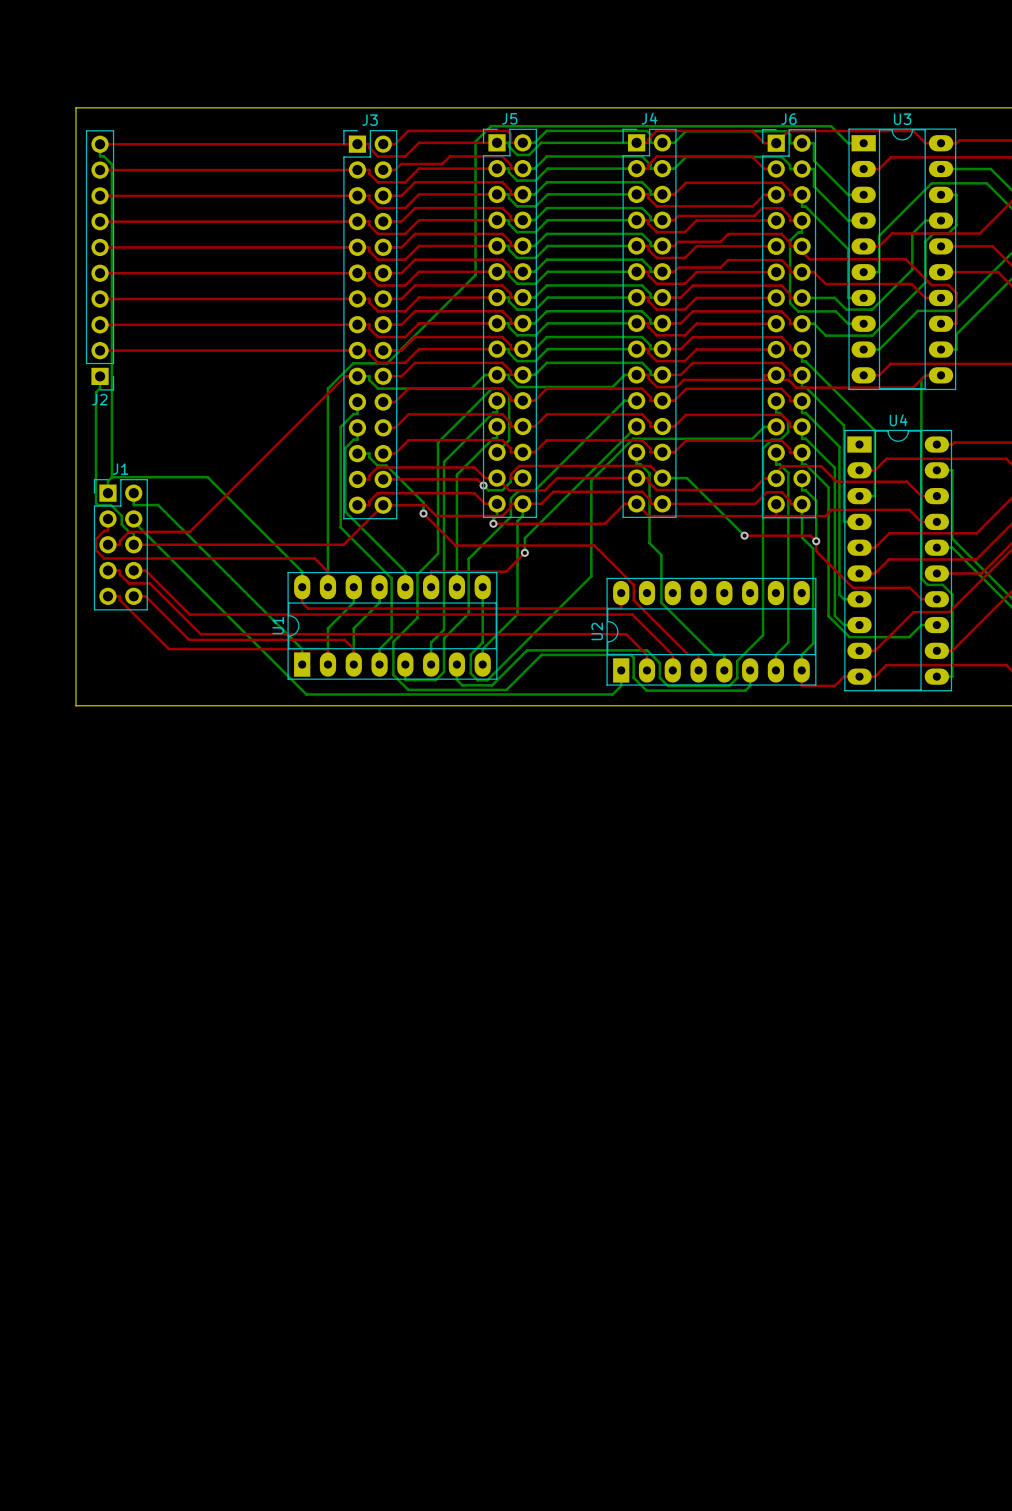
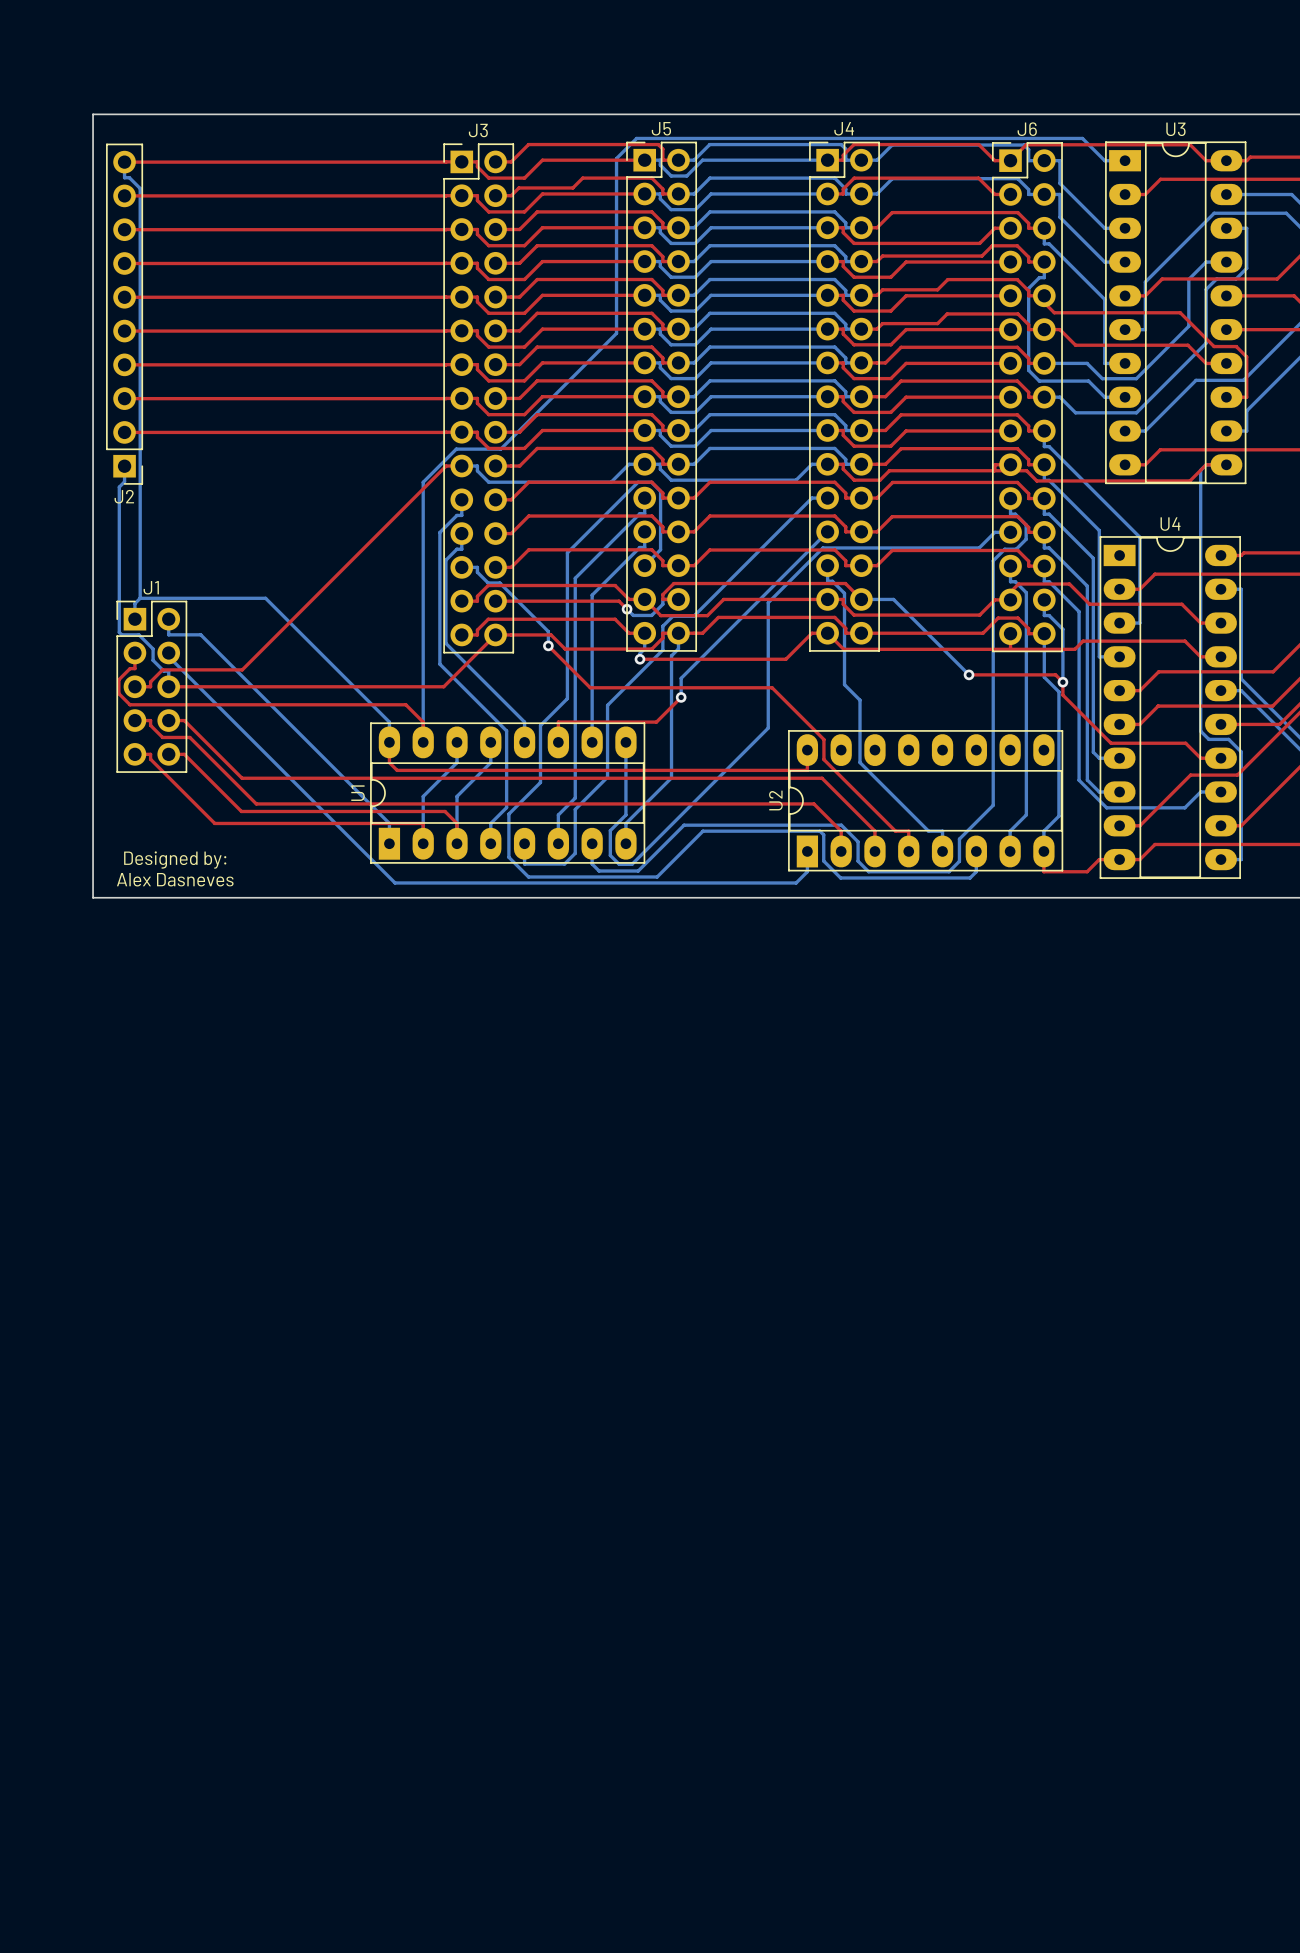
text: none -> Designed by: (175, 860)
text: none -> Alex Dasneves (175, 879)

